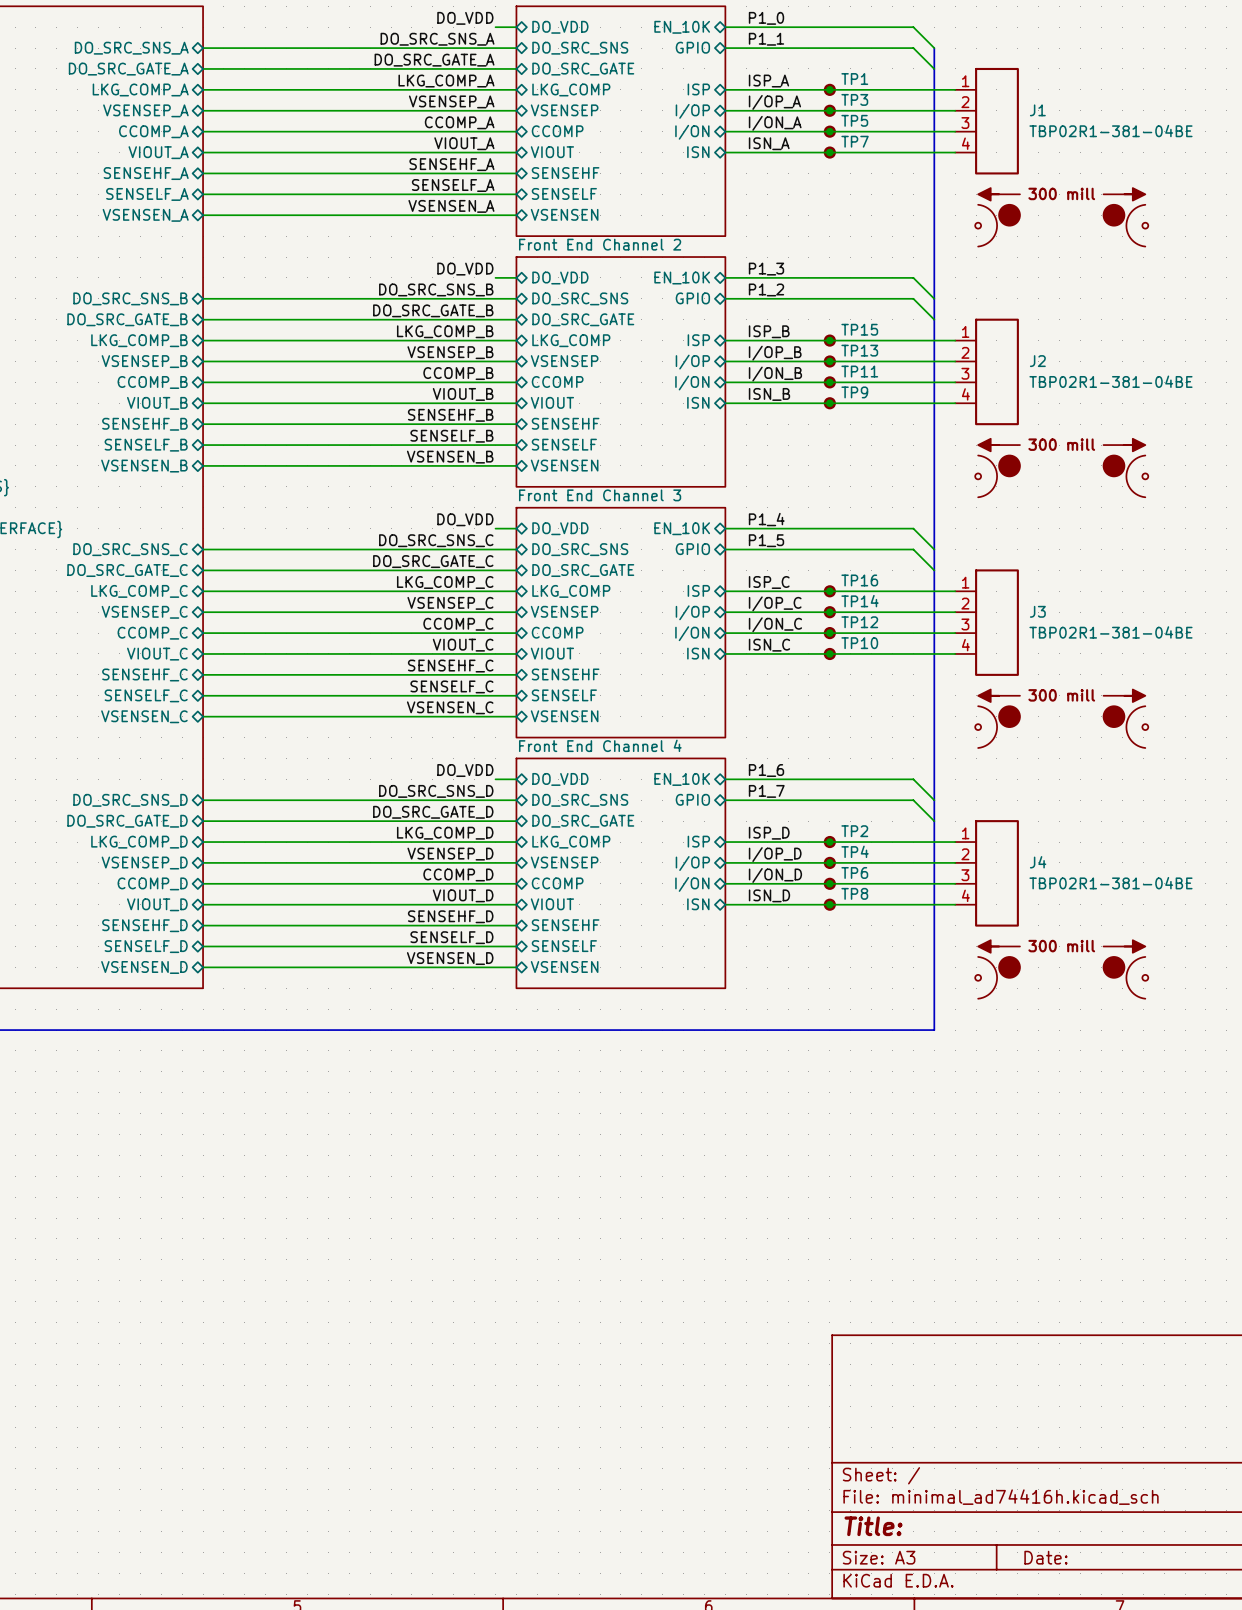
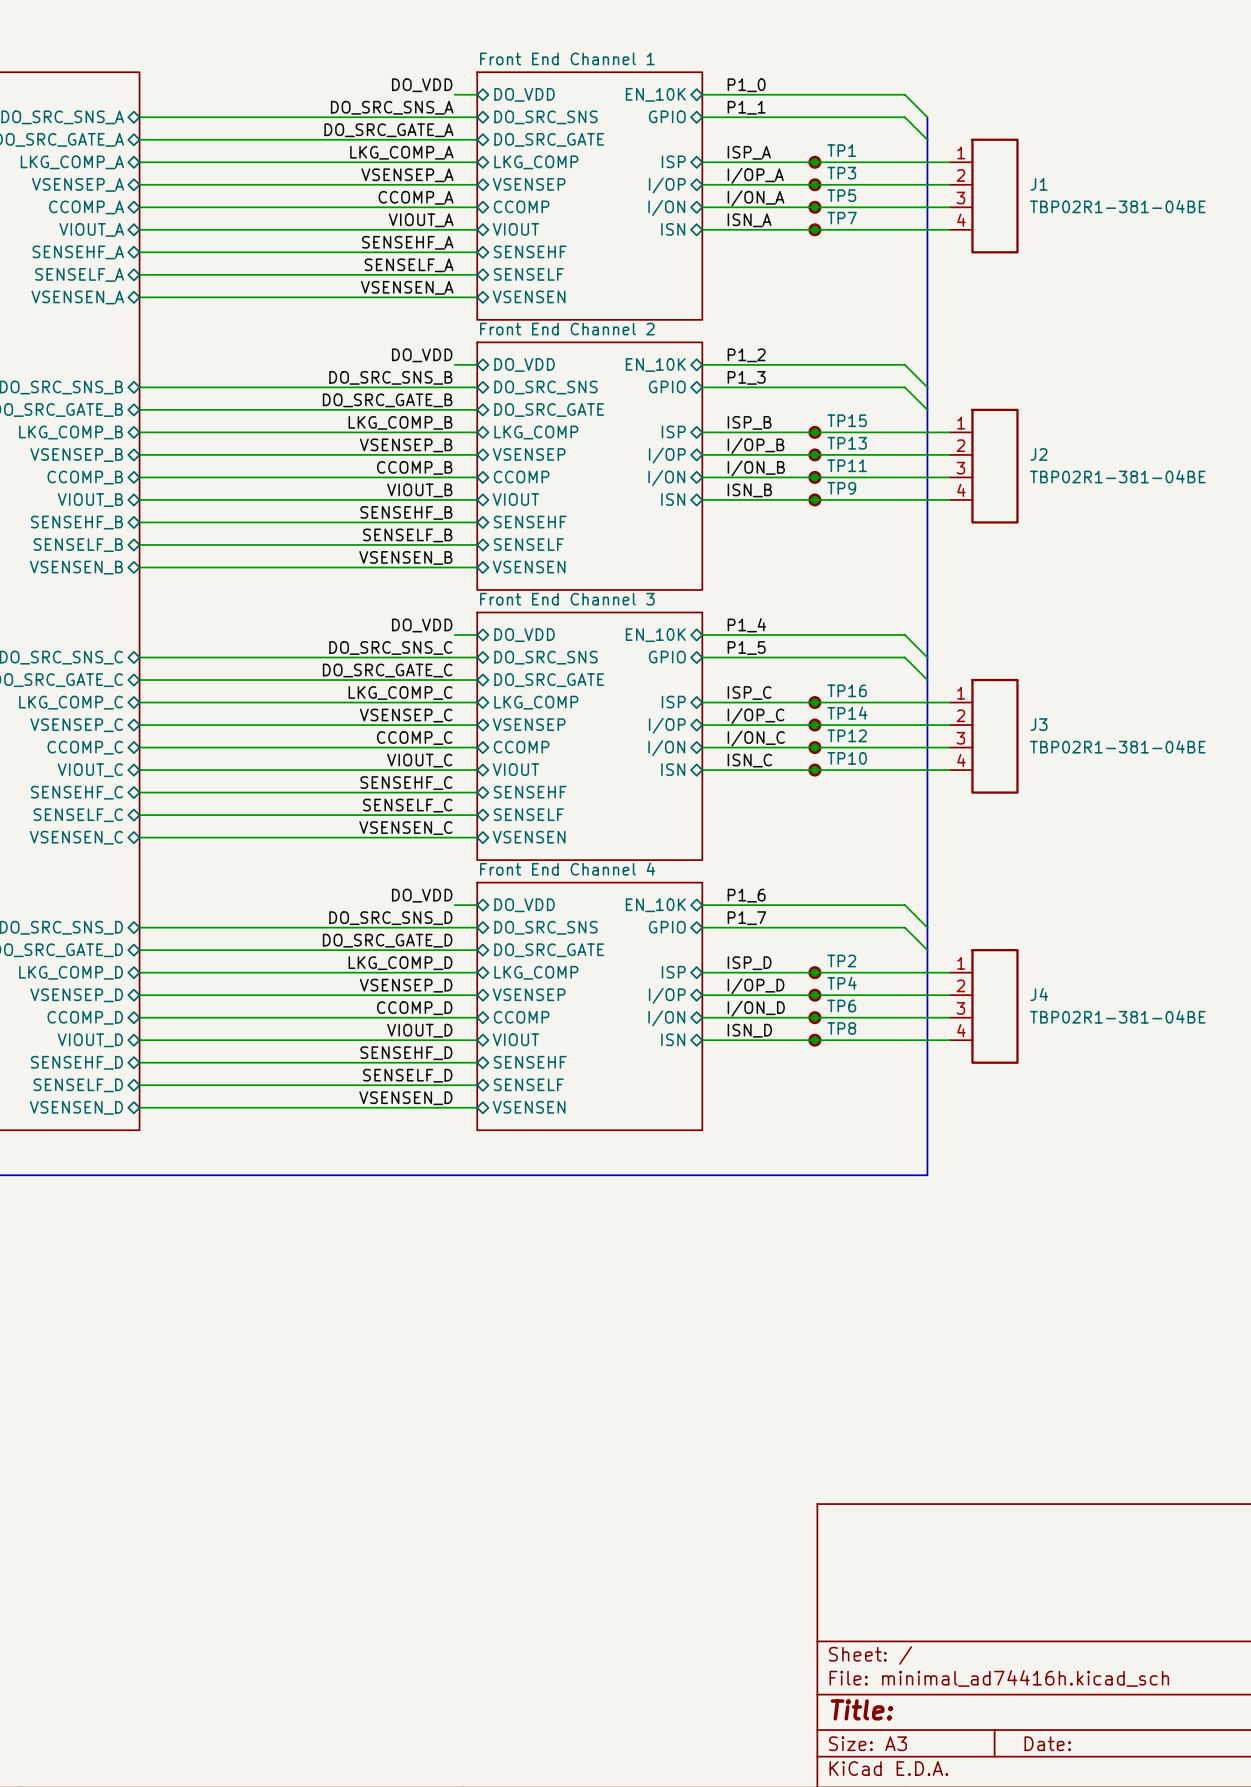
part: (1061, 217) -> none
label: P1_3 (766, 269) -> P1_2 (746, 355)
label: P1_2 (766, 289) -> P1_3 (746, 377)
part: (1061, 468) -> none
part: (1061, 718) -> none
part: (1061, 969) -> none

